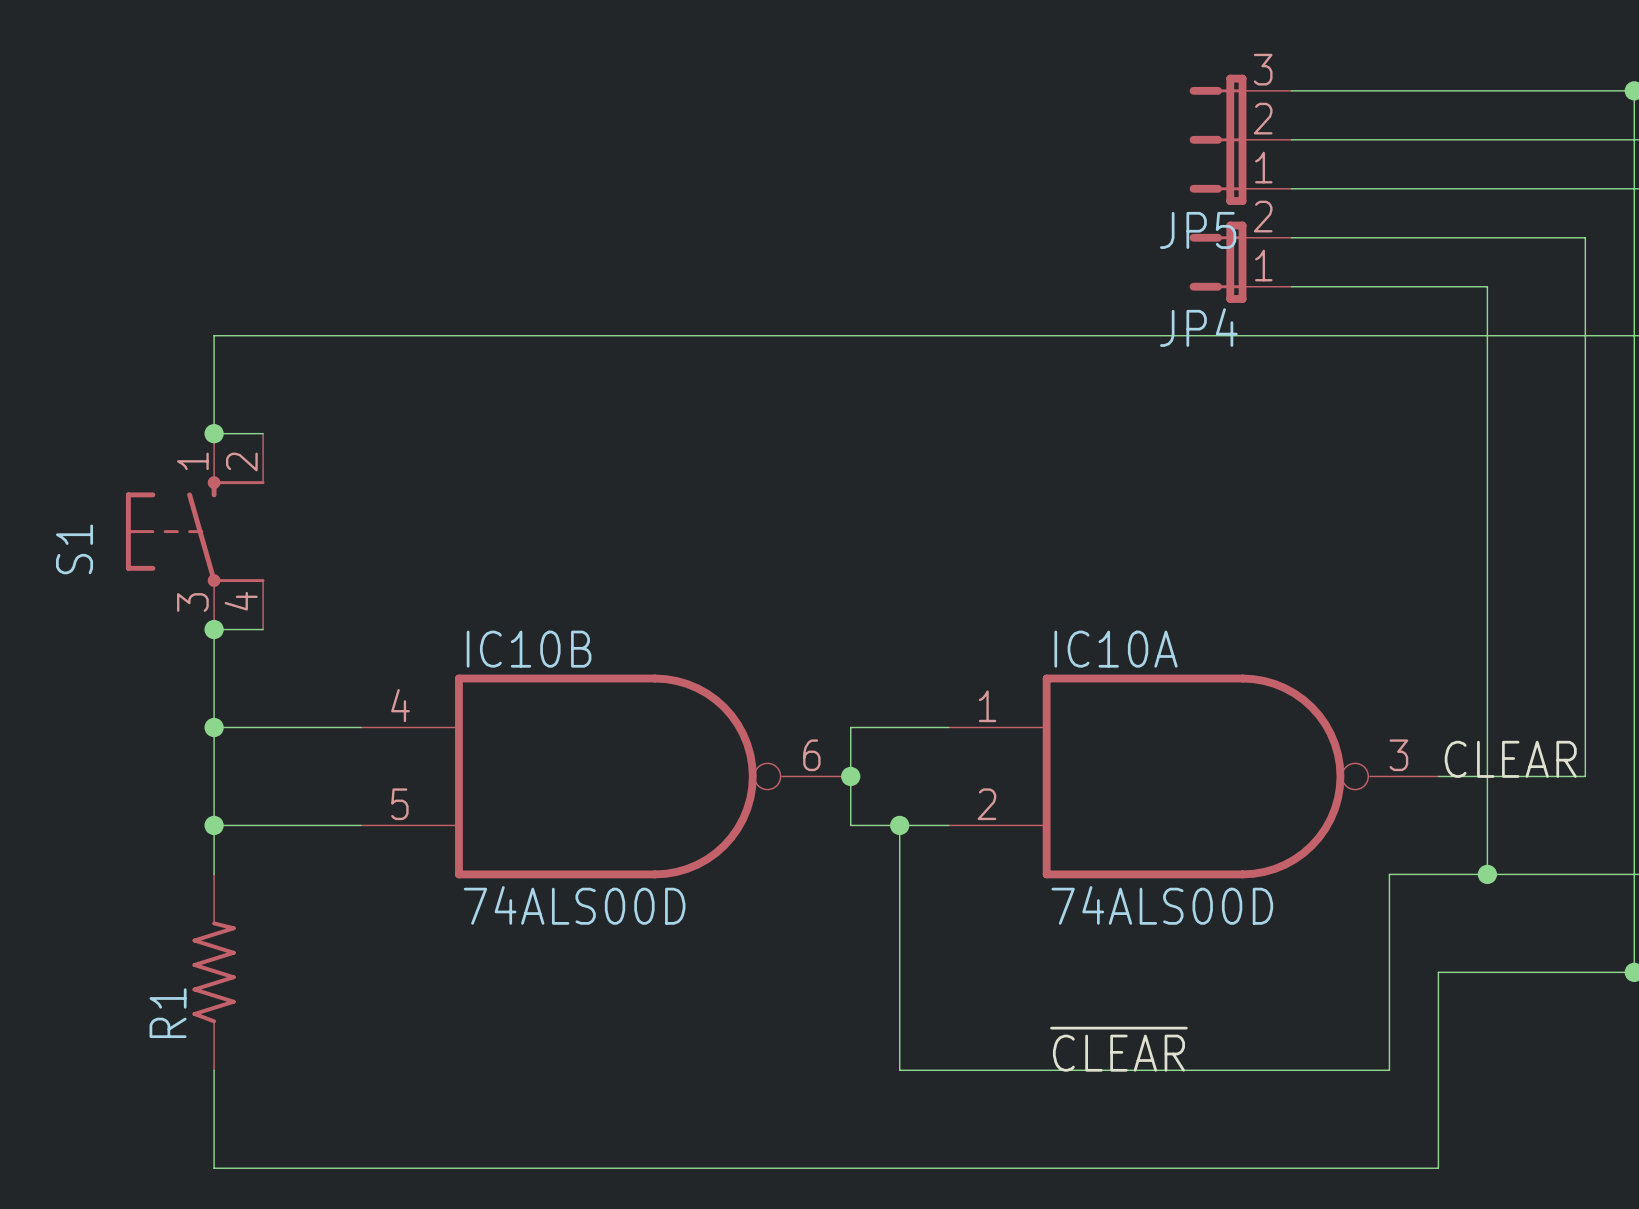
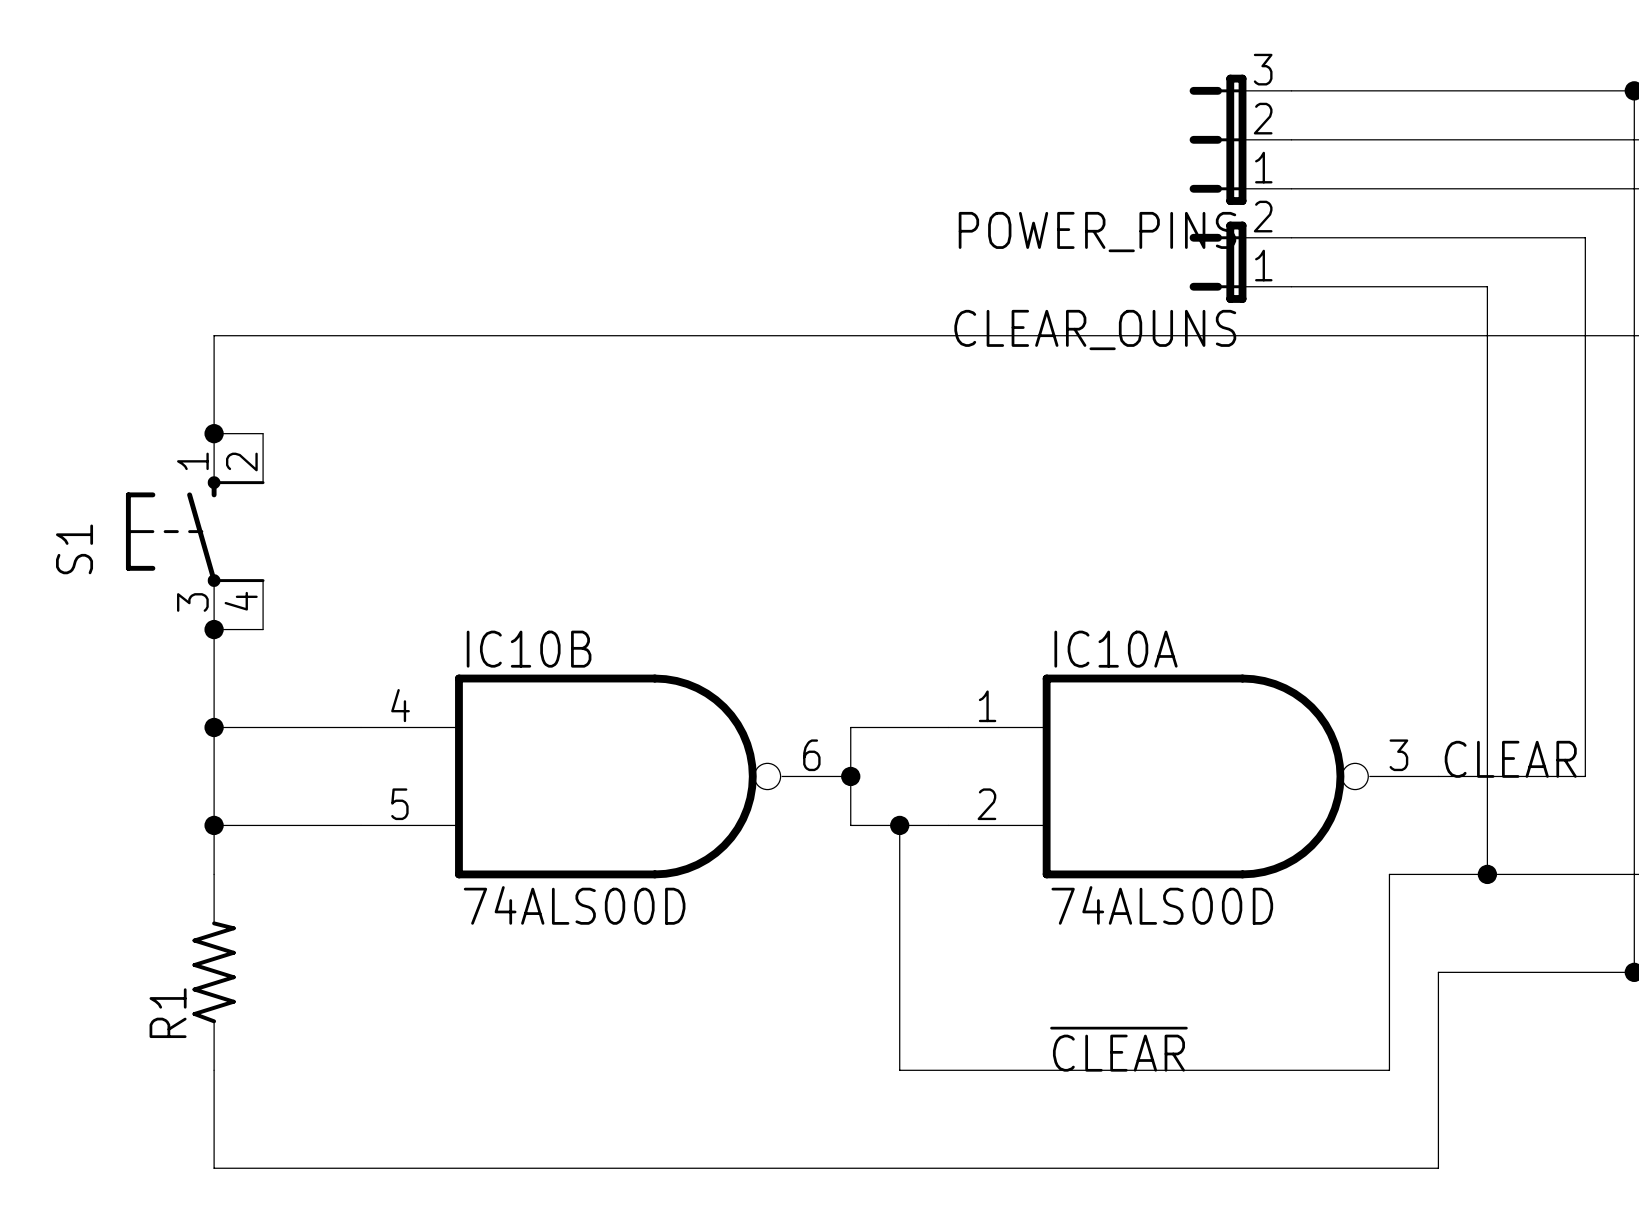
JP5 name: JP5 (1198, 230) -> POWER_PINS (1097, 232)
JP4 name: JP4 (1198, 327) -> CLEAR_OUNS (1095, 330)

